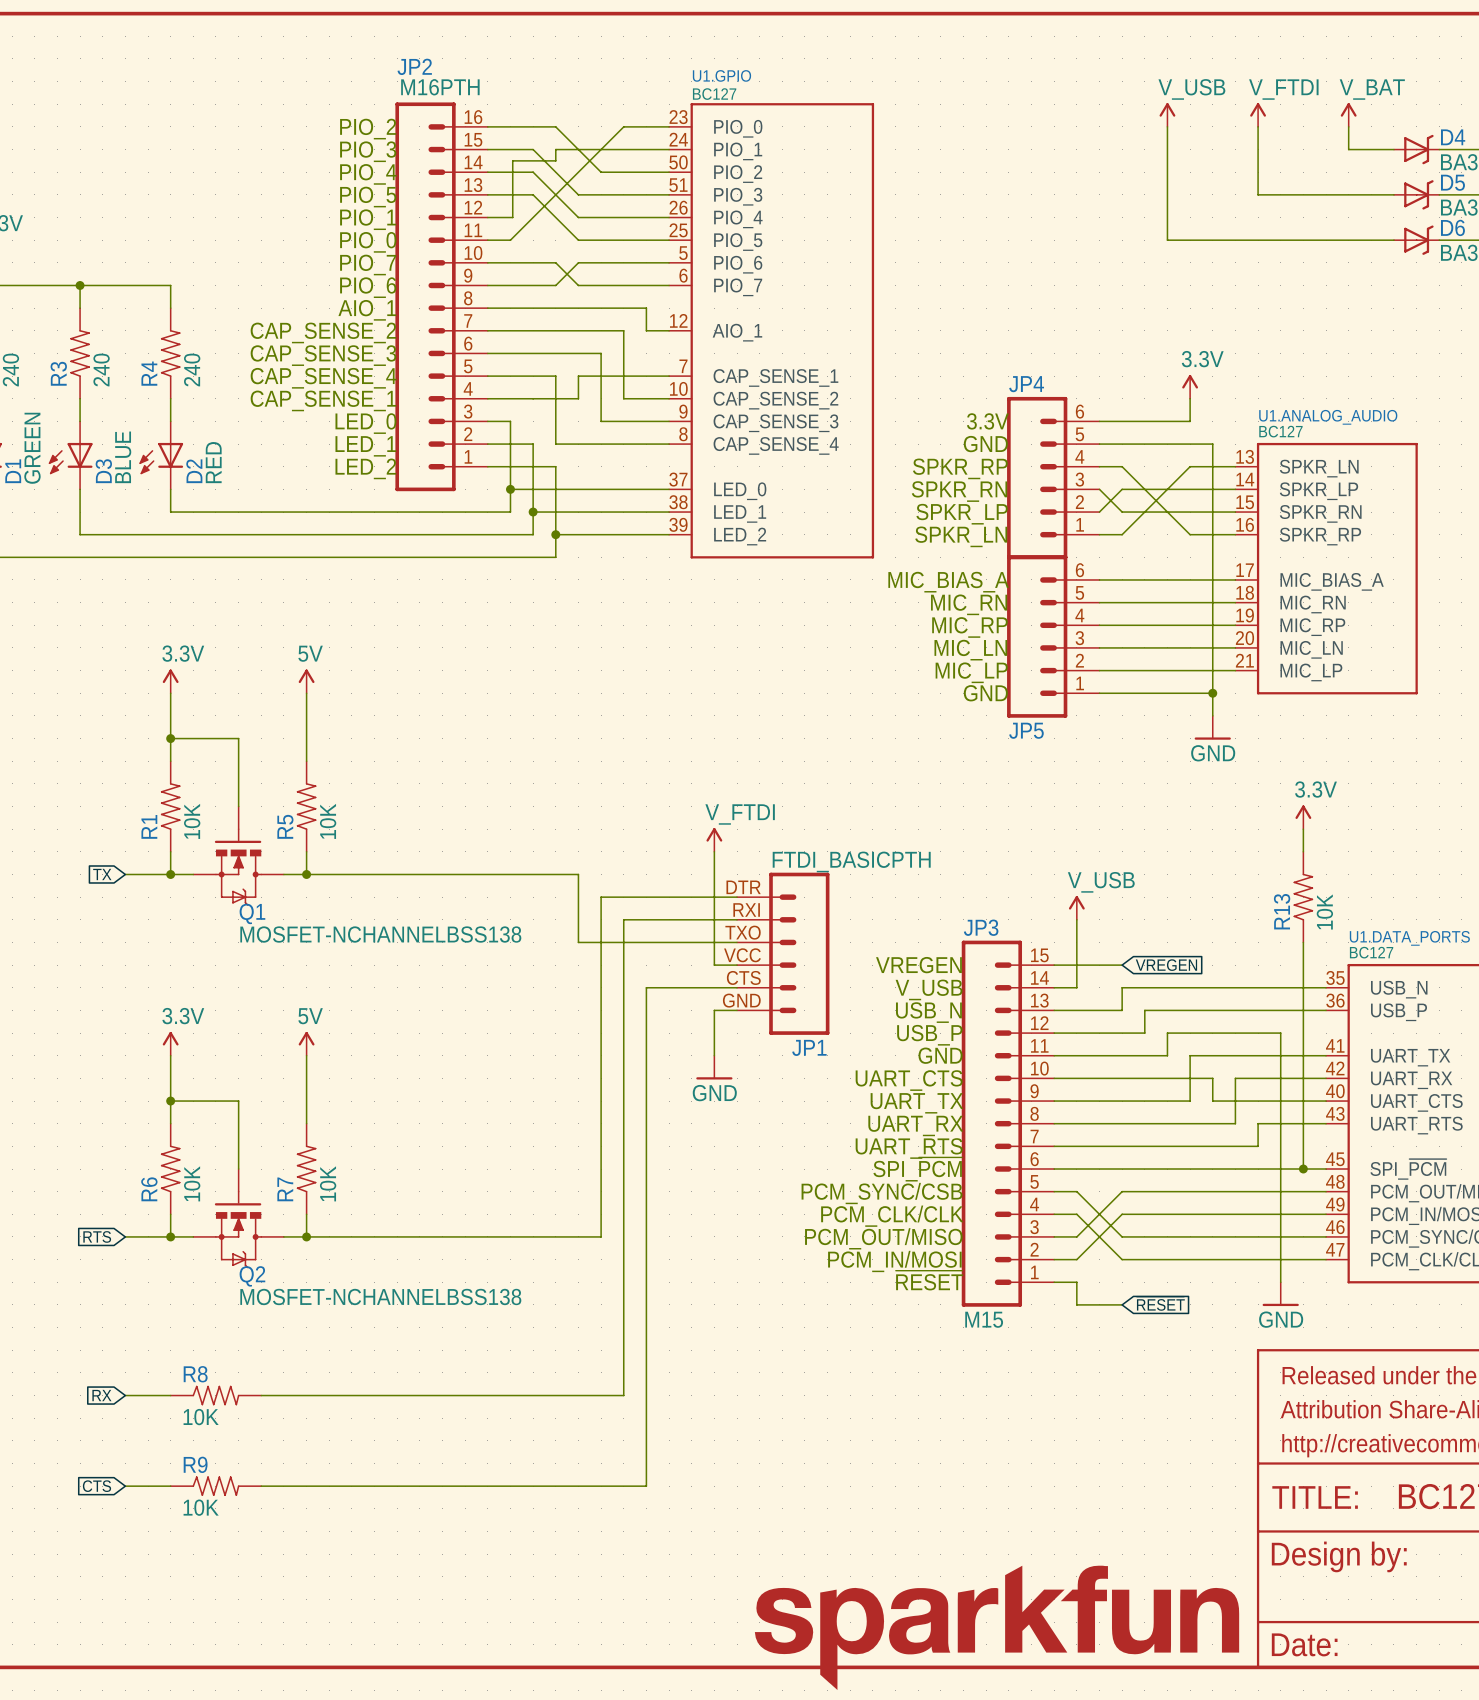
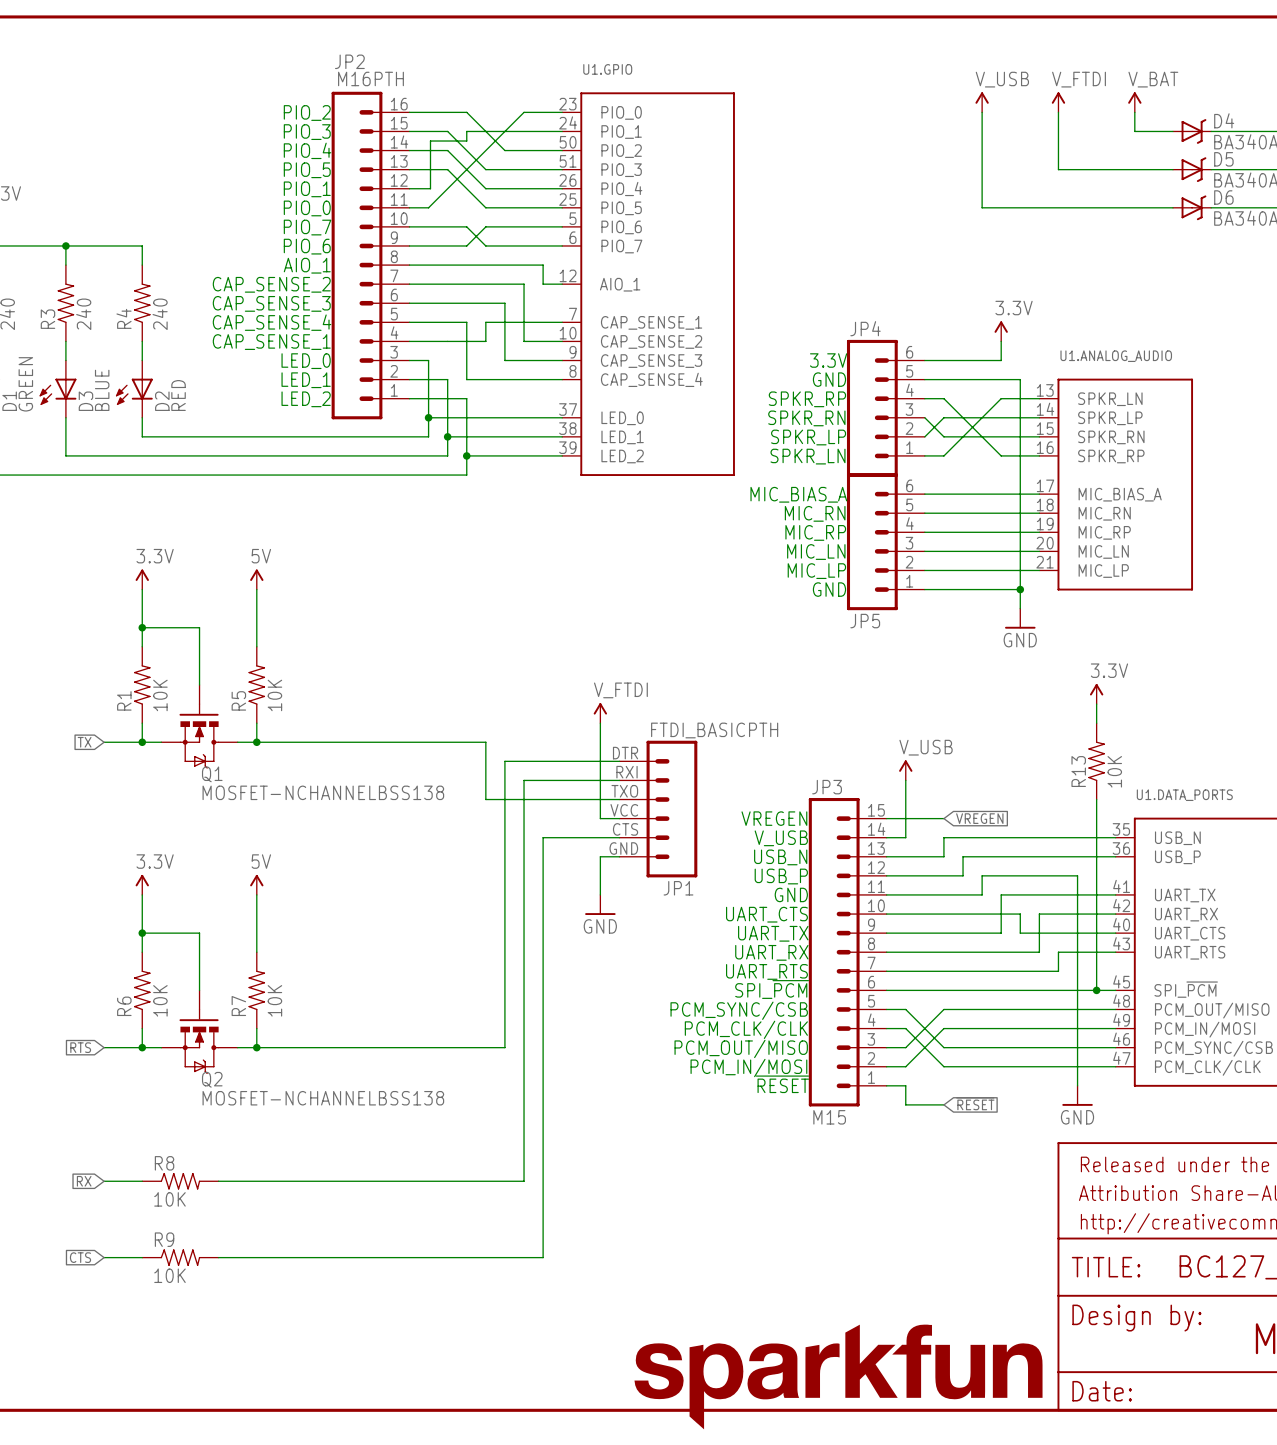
U1.GPIO value: BC127 (714, 94) -> none
U1.ANALOG_AUDIO value: BC127 (1280, 431) -> none
U1.DATA_PORTS value: BC127 (1371, 952) -> none

